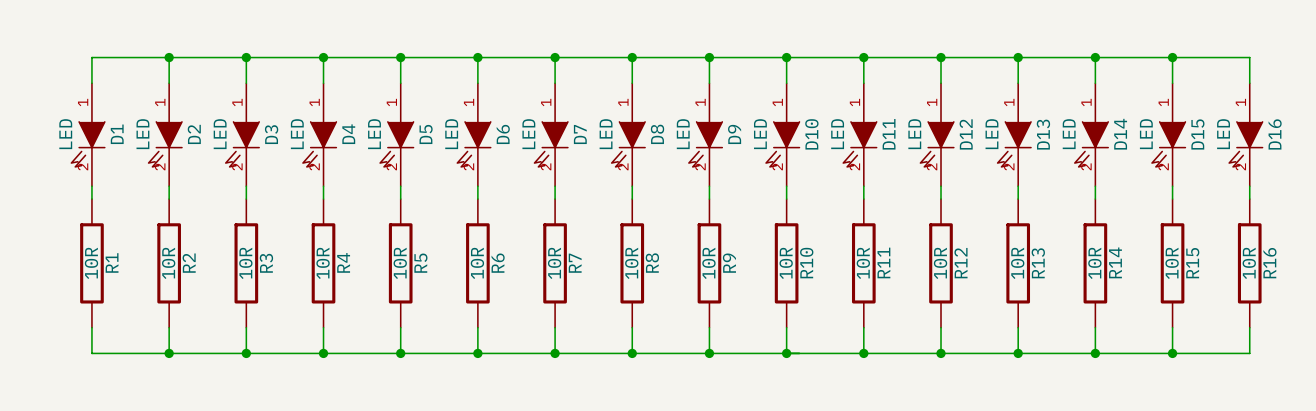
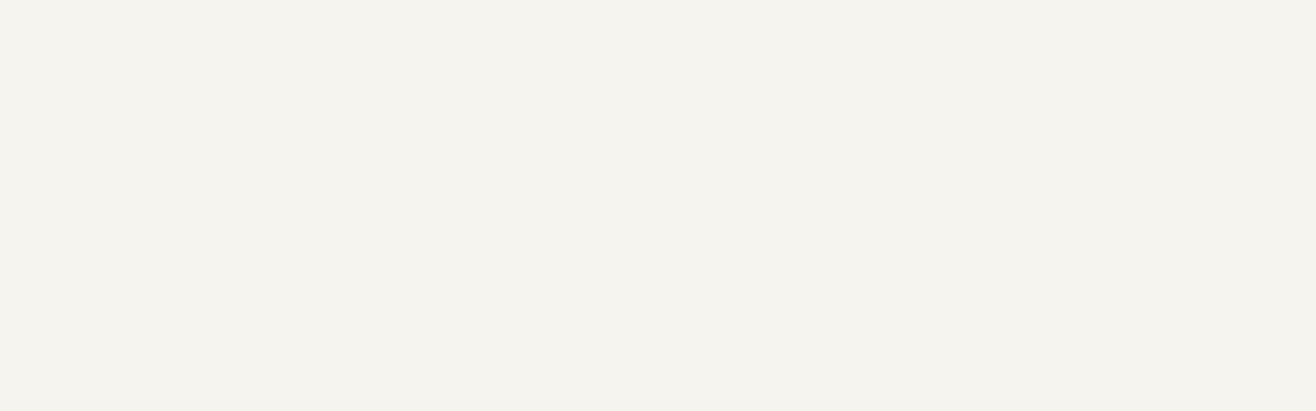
wire: (169, 57) (169, 83) -> none
junction: (169, 57) -> none
wire: (246, 57) (246, 83) -> none
junction: (246, 57) -> none
wire: (323, 57) (323, 83) -> none
junction: (323, 57) -> none
wire: (400, 57) (400, 83) -> none
junction: (400, 57) -> none
wire: (477, 57) (477, 83) -> none
junction: (477, 57) -> none
wire: (555, 57) (555, 83) -> none
junction: (555, 57) -> none
wire: (632, 57) (632, 83) -> none
junction: (632, 57) -> none
wire: (709, 57) (709, 83) -> none
junction: (709, 57) -> none
wire: (786, 57) (786, 83) -> none
junction: (786, 57) -> none
wire: (863, 57) (863, 83) -> none
junction: (863, 57) -> none
wire: (941, 57) (941, 83) -> none
junction: (941, 57) -> none
wire: (1018, 57) (1018, 83) -> none
junction: (1018, 57) -> none
wire: (1095, 57) (1095, 83) -> none
junction: (1095, 57) -> none
wire: (1172, 57) (1172, 83) -> none
junction: (1172, 57) -> none
wire: (91, 83) (91, 57) (1249, 57) (1249, 83) -> none
D1: LED (88, 134) -> none
D2: LED (165, 134) -> none
D3: LED (242, 134) -> none
D4: LED (319, 134) -> none
D5: LED (396, 134) -> none
D6: LED (474, 134) -> none
D7: LED (551, 134) -> none
D8: LED (628, 134) -> none
D9: LED (705, 134) -> none
D10: LED (782, 134) -> none
D11: LED (859, 134) -> none
D12: LED (937, 134) -> none
D13: LED (1014, 134) -> none
D14: LED (1091, 134) -> none
D15: LED (1168, 134) -> none
D16: LED (1245, 134) -> none
wire: (91, 186) (91, 199) -> none
wire: (169, 186) (169, 199) -> none
wire: (246, 186) (246, 199) -> none
wire: (323, 186) (323, 199) -> none
wire: (400, 186) (400, 199) -> none
wire: (477, 186) (477, 199) -> none
wire: (555, 186) (555, 199) -> none
wire: (632, 186) (632, 199) -> none
wire: (709, 186) (709, 199) -> none
wire: (786, 186) (786, 199) -> none
wire: (863, 186) (863, 199) -> none
wire: (941, 186) (941, 199) -> none
wire: (1018, 186) (1018, 199) -> none
wire: (1095, 186) (1095, 199) -> none
wire: (1172, 186) (1172, 199) -> none
wire: (1249, 186) (1249, 199) -> none
R1: 10R (91, 263) -> none
R2: 10R (169, 263) -> none
R3: 10R (246, 263) -> none
R4: 10R (323, 263) -> none
R5: 10R (400, 263) -> none
R6: 10R (477, 263) -> none
R7: 10R (555, 263) -> none
R8: 10R (632, 263) -> none
R9: 10R (709, 263) -> none
R10: 10R (786, 263) -> none
R11: 10R (863, 263) -> none
R12: 10R (941, 263) -> none
R13: 10R (1018, 263) -> none
R14: 10R (1095, 263) -> none
R15: 10R (1172, 263) -> none
R16: 10R (1249, 263) -> none
wire: (91, 327) (91, 353) (1249, 353) (1249, 327) -> none
wire: (169, 327) (169, 353) -> none
wire: (246, 327) (246, 353) -> none
wire: (323, 327) (323, 353) -> none
wire: (400, 327) (400, 353) -> none
wire: (477, 327) (477, 353) -> none
wire: (555, 327) (555, 353) -> none
wire: (632, 327) (632, 353) -> none
wire: (709, 327) (709, 353) -> none
wire: (786, 327) (786, 353) -> none
wire: (863, 327) (863, 353) -> none
wire: (941, 327) (941, 353) -> none
wire: (1018, 327) (1018, 353) -> none
wire: (1095, 327) (1095, 353) -> none
wire: (1172, 327) (1172, 353) -> none
junction: (169, 353) -> none
junction: (246, 353) -> none
junction: (323, 353) -> none
junction: (400, 353) -> none
junction: (477, 353) -> none
junction: (555, 353) -> none
junction: (632, 353) -> none
junction: (709, 353) -> none
junction: (786, 353) -> none
junction: (863, 353) -> none
junction: (941, 353) -> none
junction: (1018, 353) -> none
junction: (1095, 353) -> none
junction: (1172, 353) -> none

